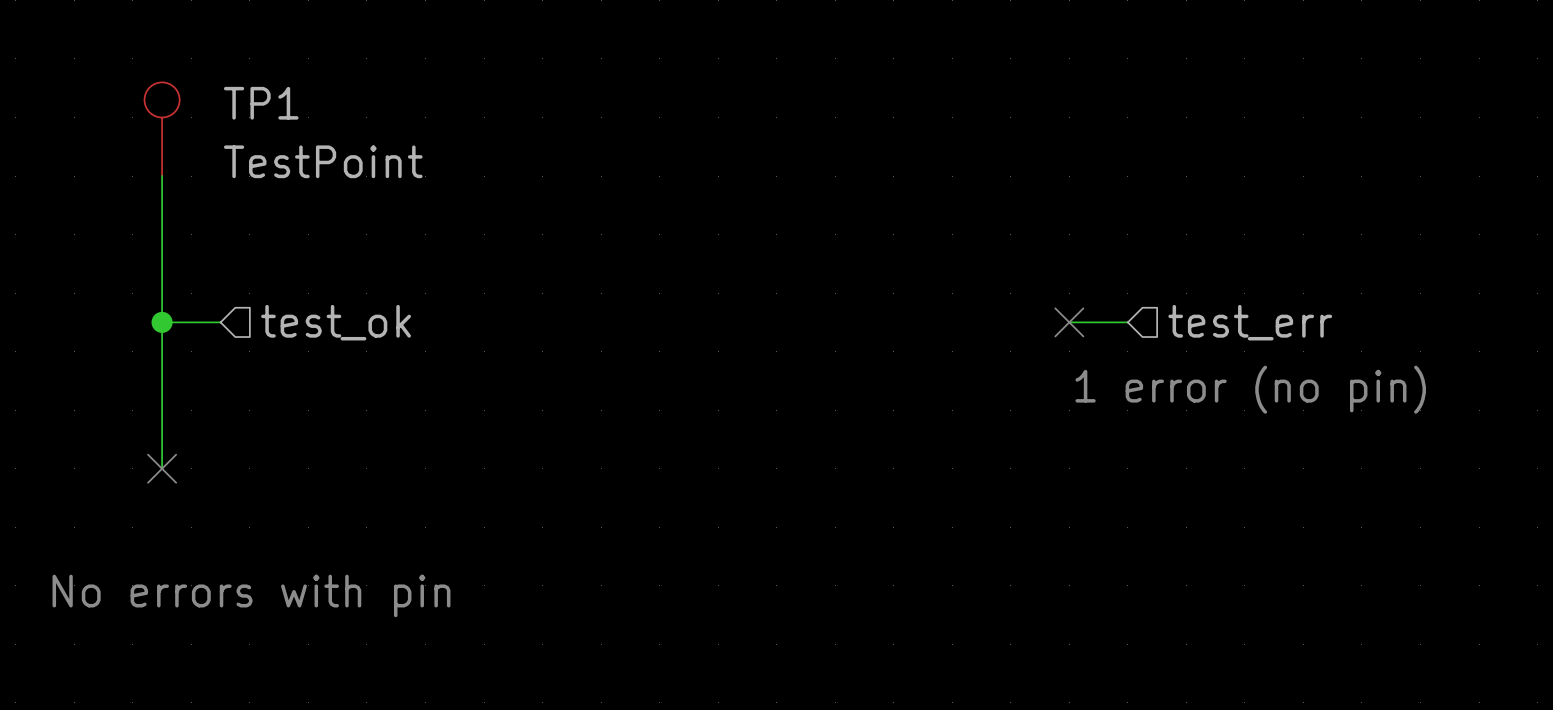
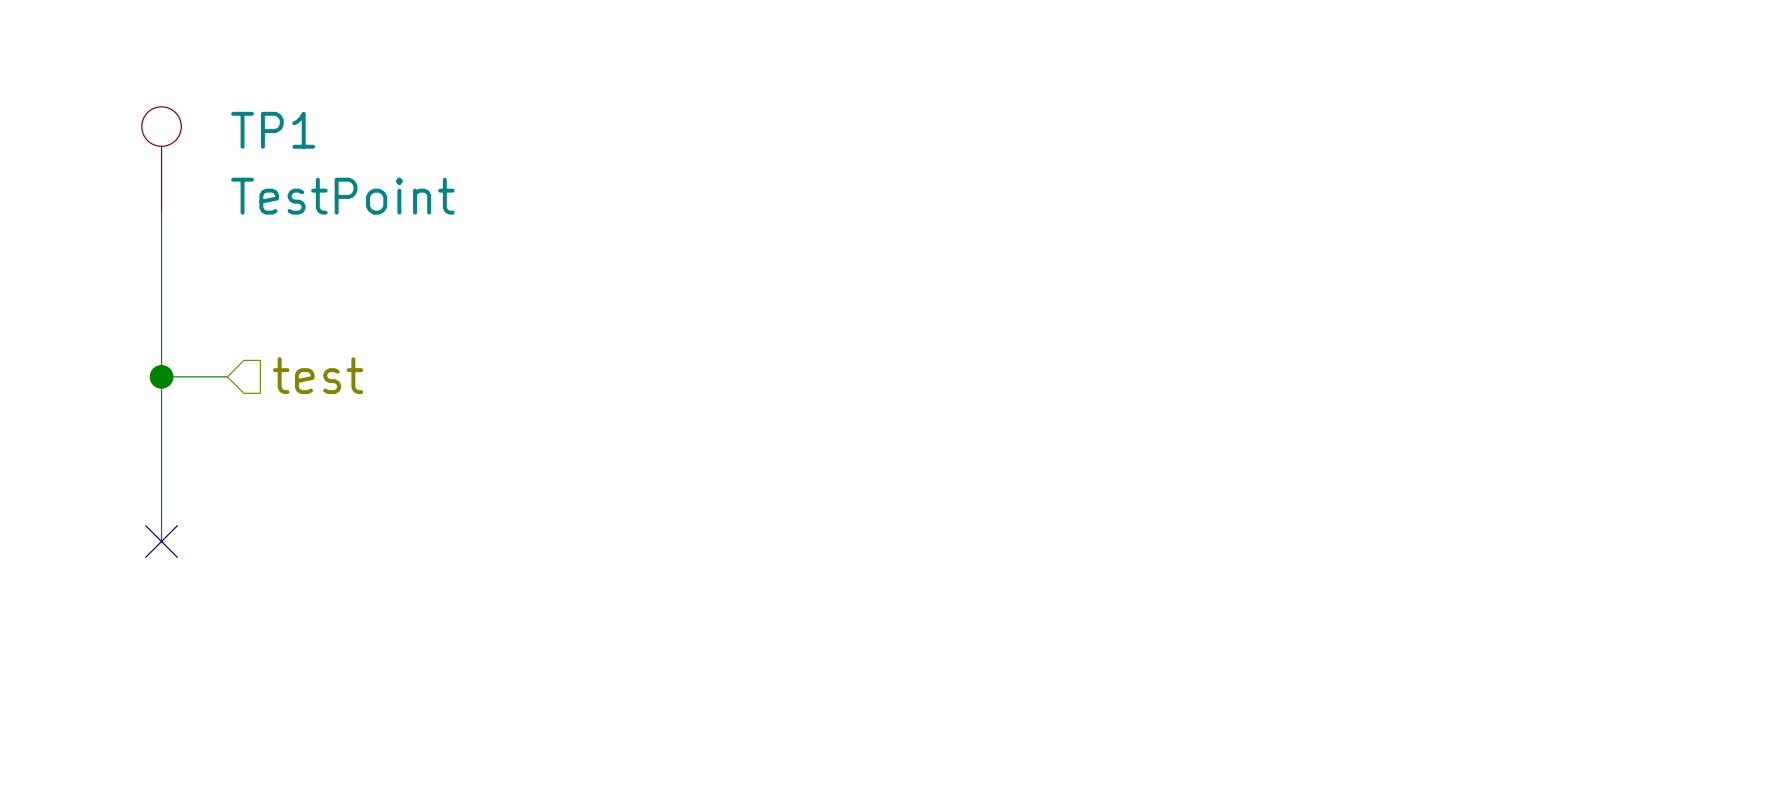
hierarchical label: test_ok (336, 322) -> test (318, 375)
wire: (1069, 322) (1127, 322) -> none
no-connect mark: (1069, 322) -> none
hierarchical label: test_err (1250, 322) -> none
text: 1 error (no pin) (1250, 389) -> none
text: No errors with pin (251, 595) -> none

